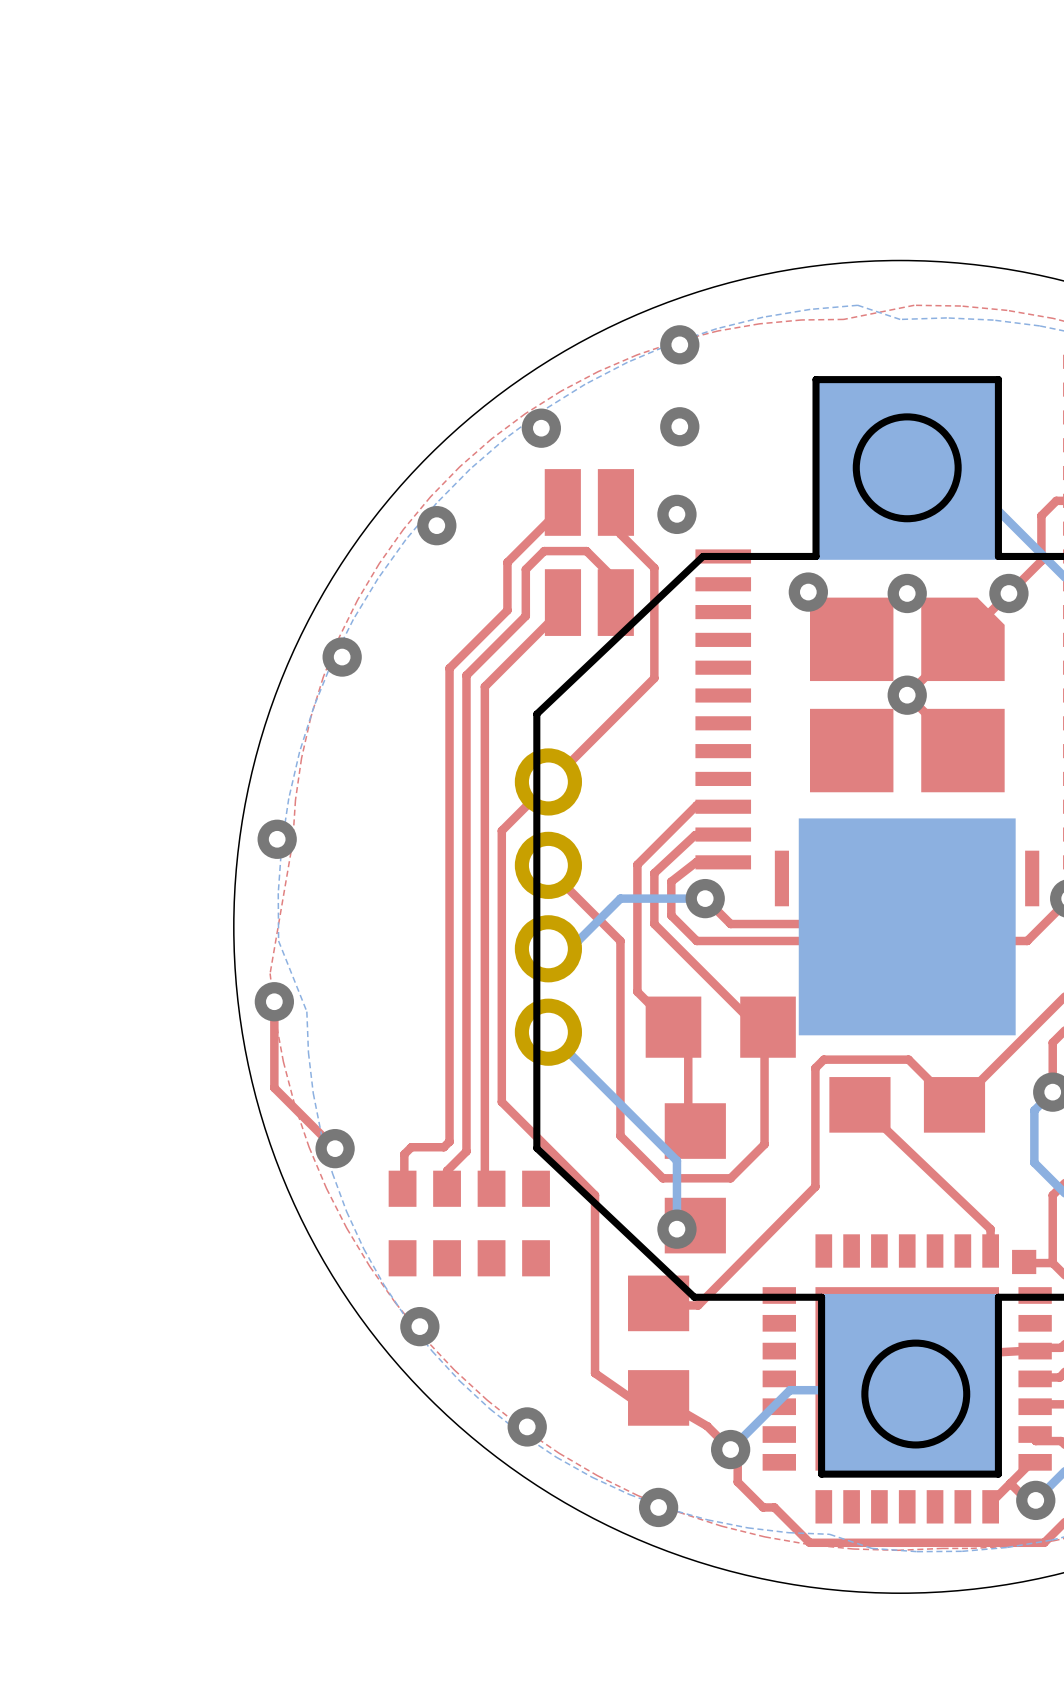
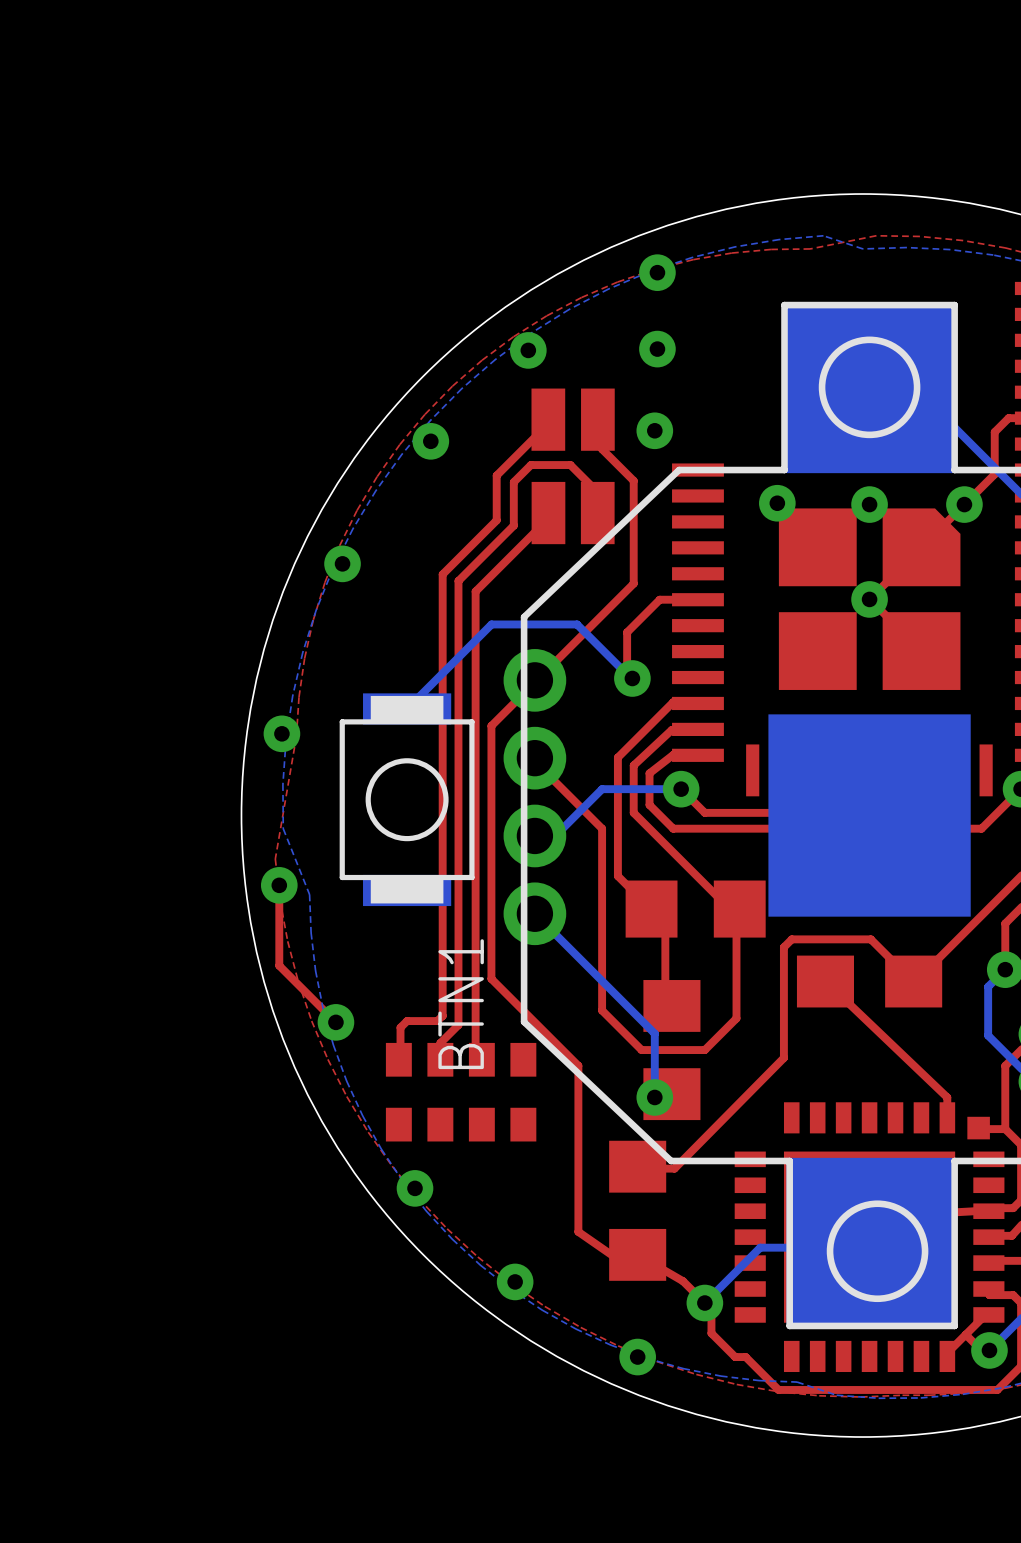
top track: none -> (697, 599) (659, 599) (627, 632) (627, 673) (632, 678)
bottom track: none -> (632, 678) (577, 624) (491, 624) (407, 708)
via: none -> (632, 678)
BTN1: none -> (407, 799)

